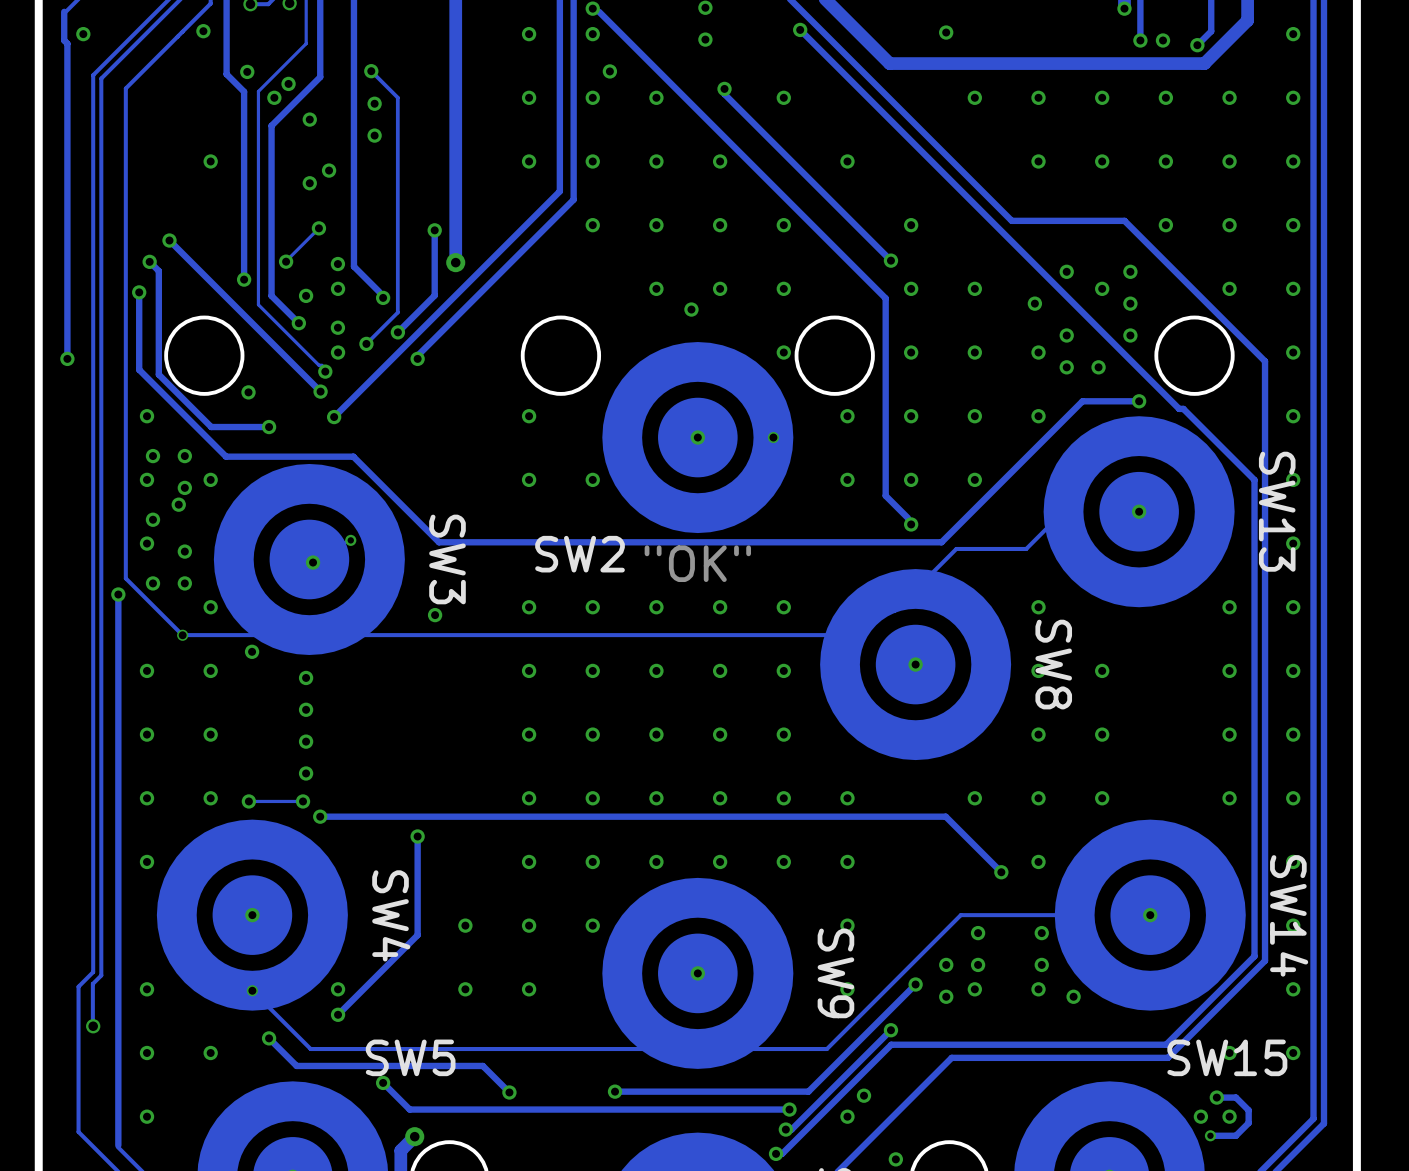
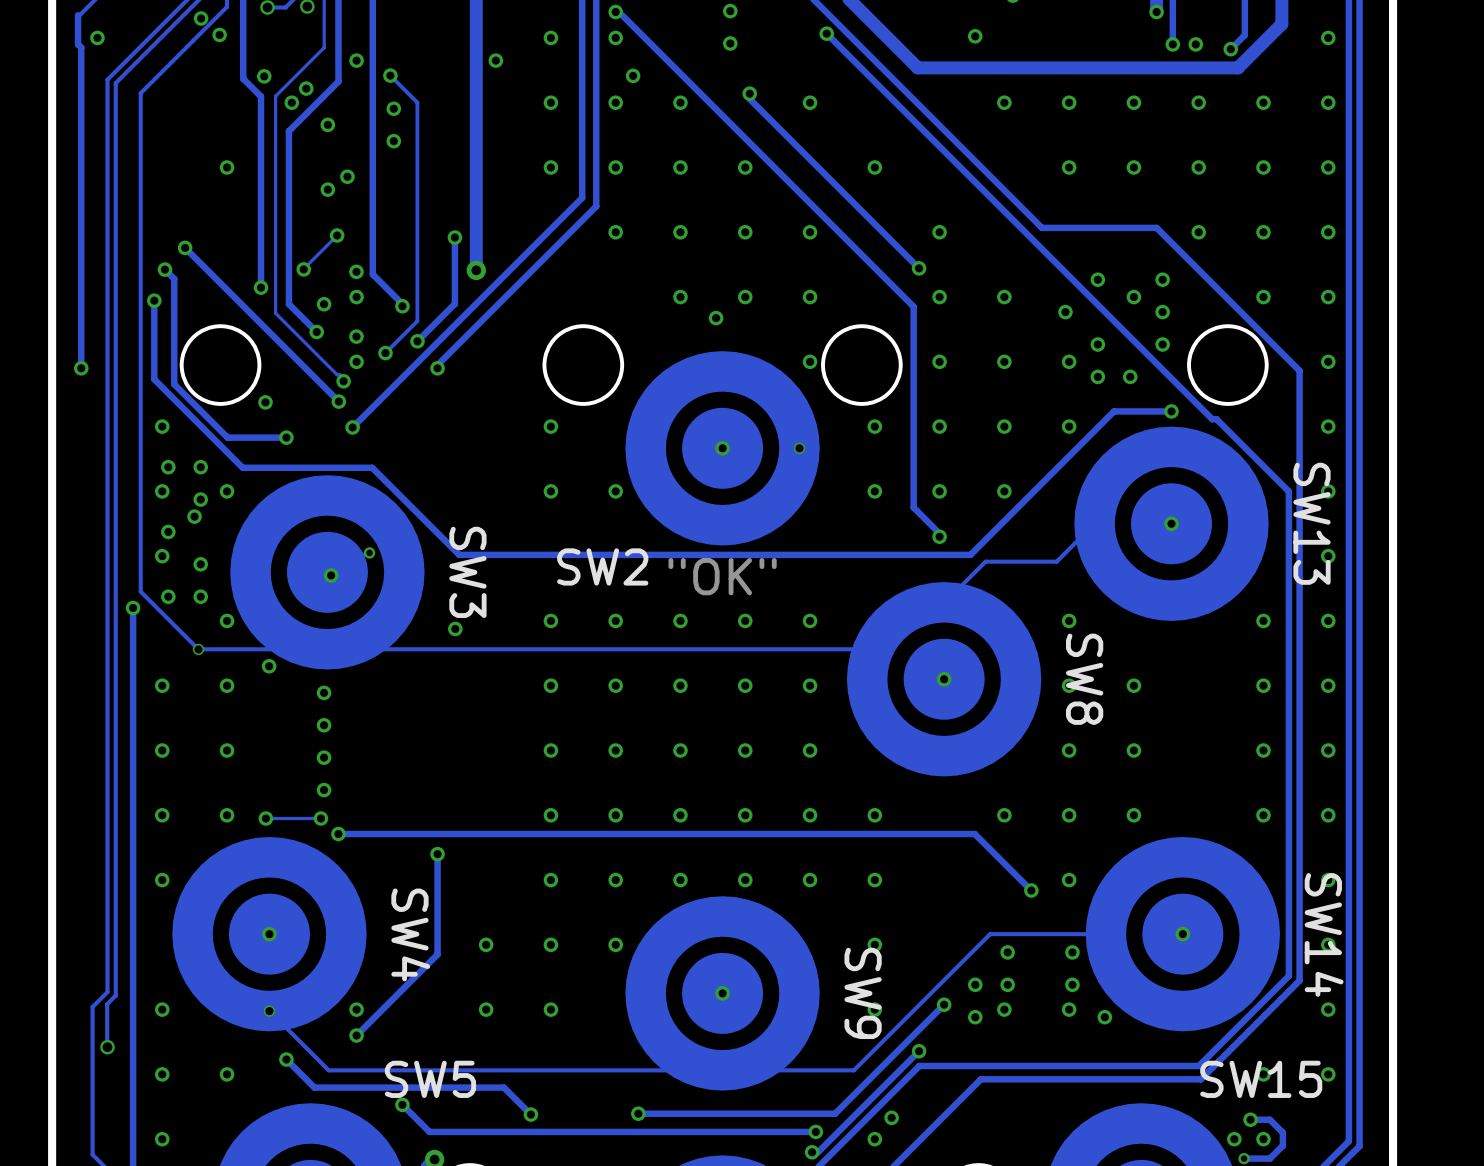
via: none -> (201, 18)
via: none -> (356, 60)
via: none -> (495, 60)

